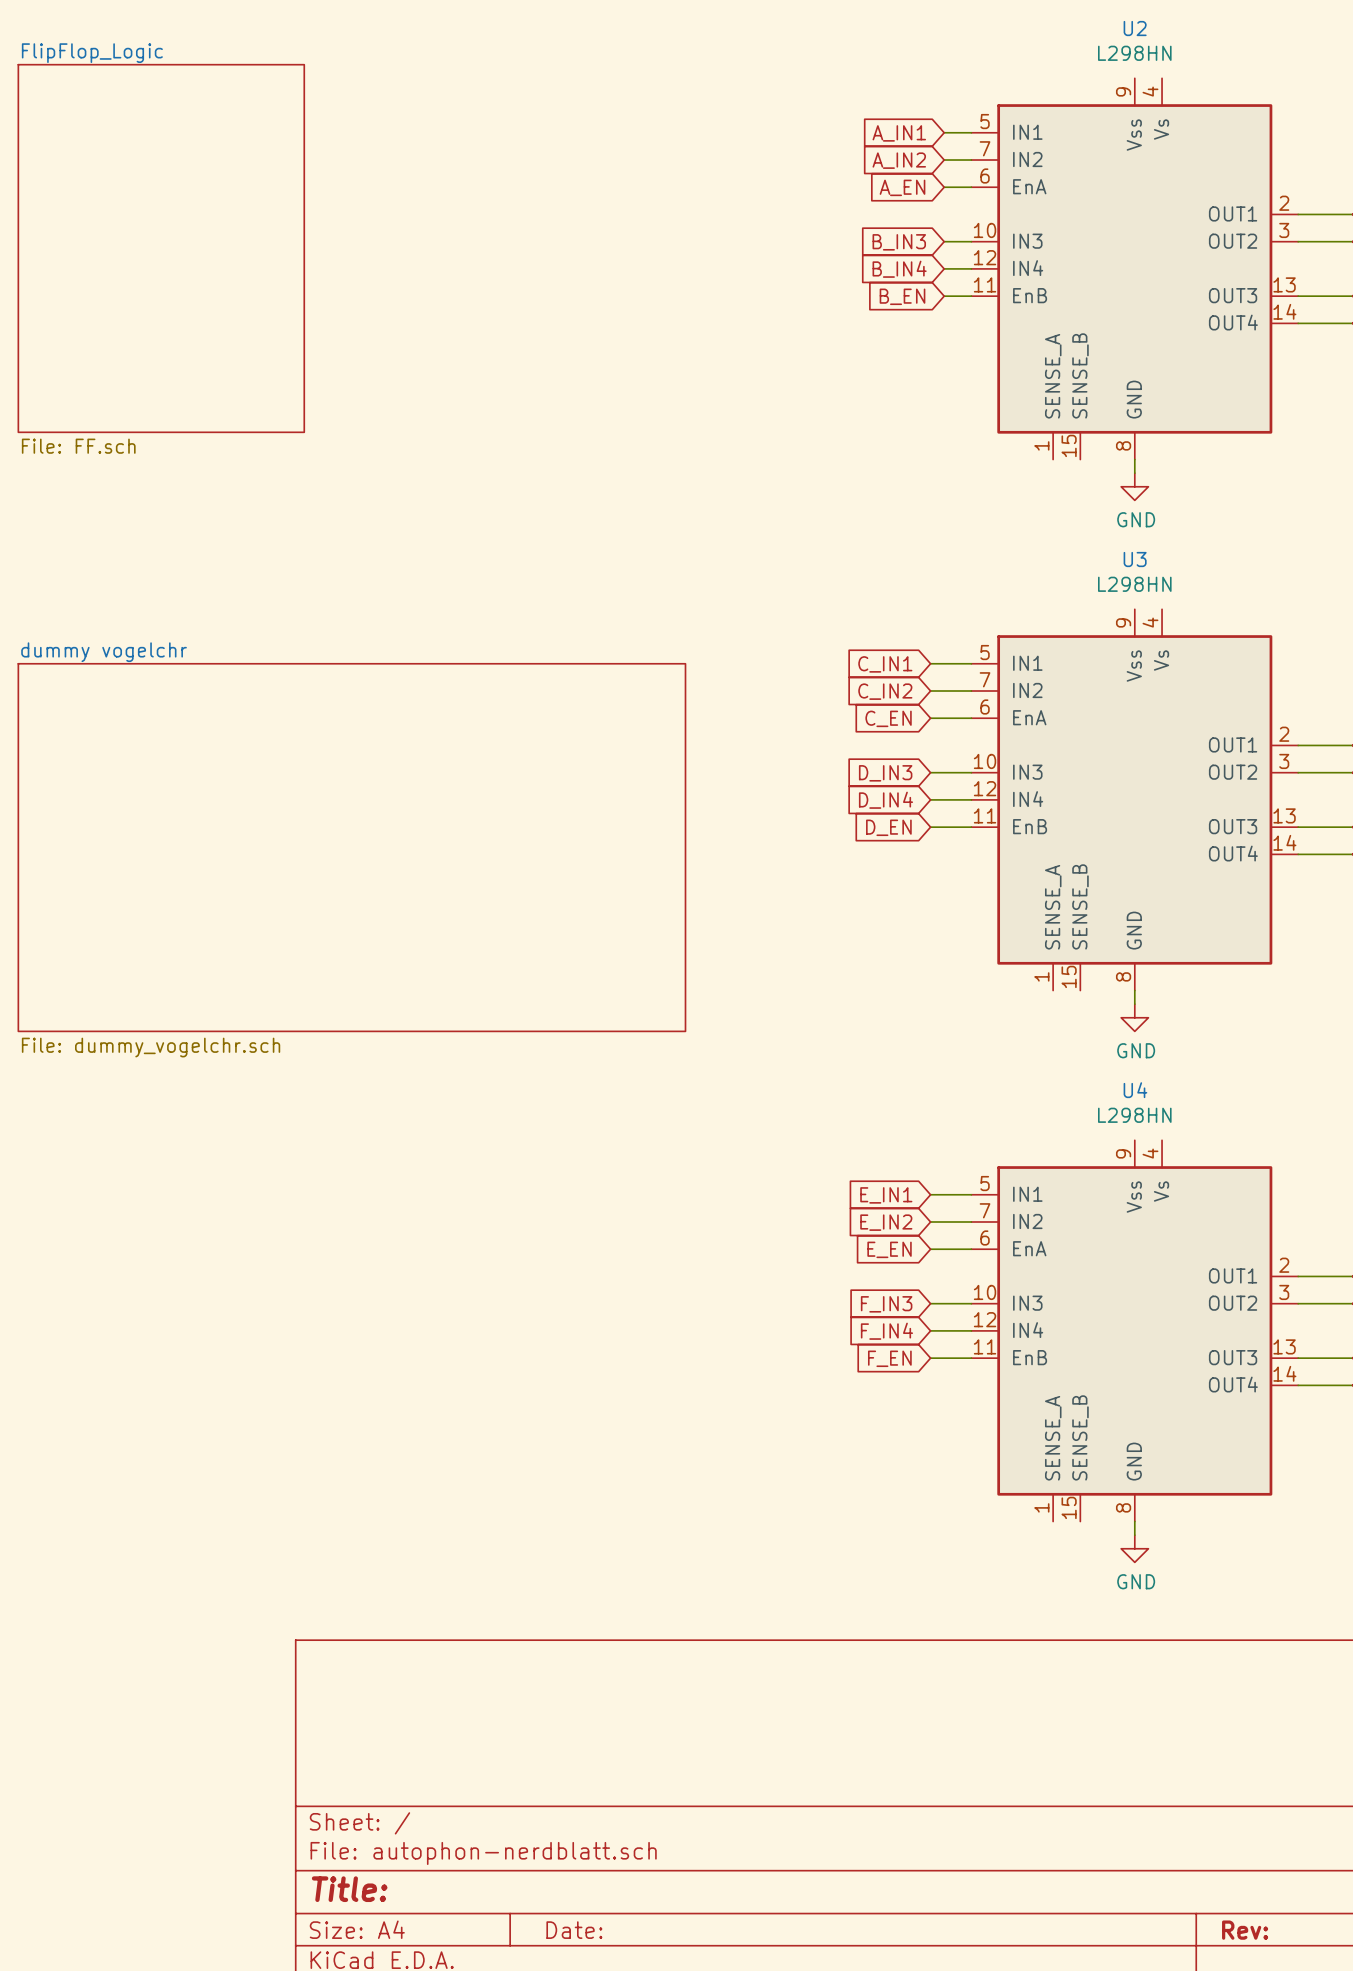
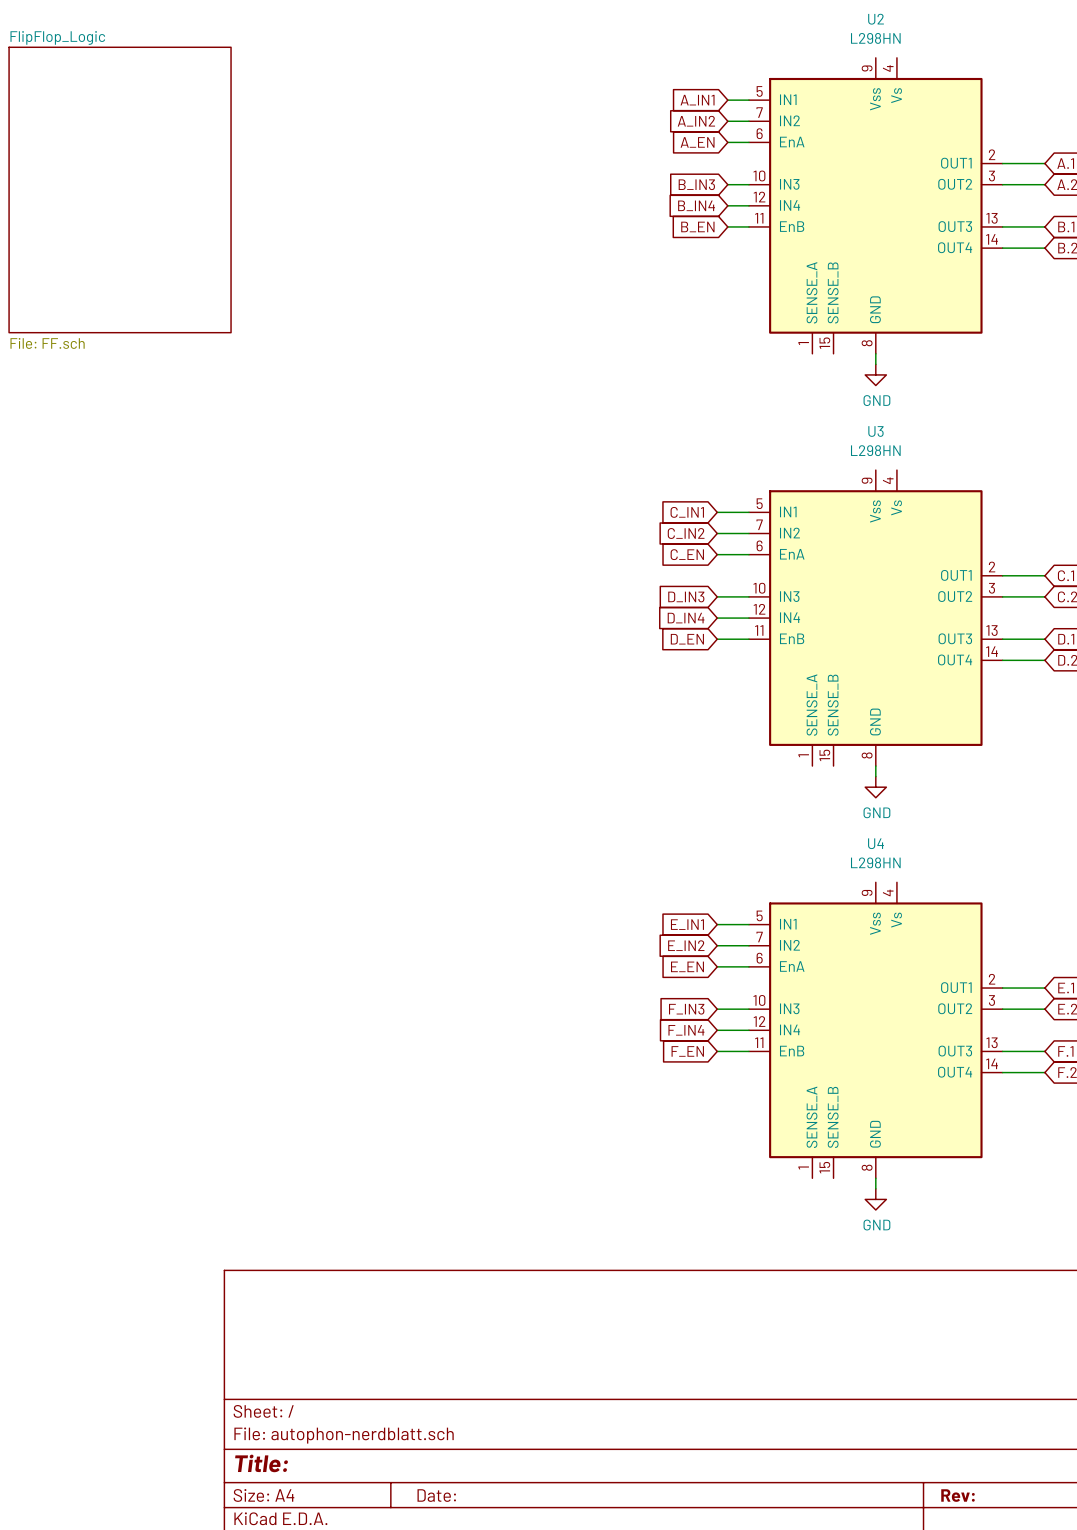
sheet dummy vogelchr: File: dummy_vogelchr.sch (351, 847) -> none

